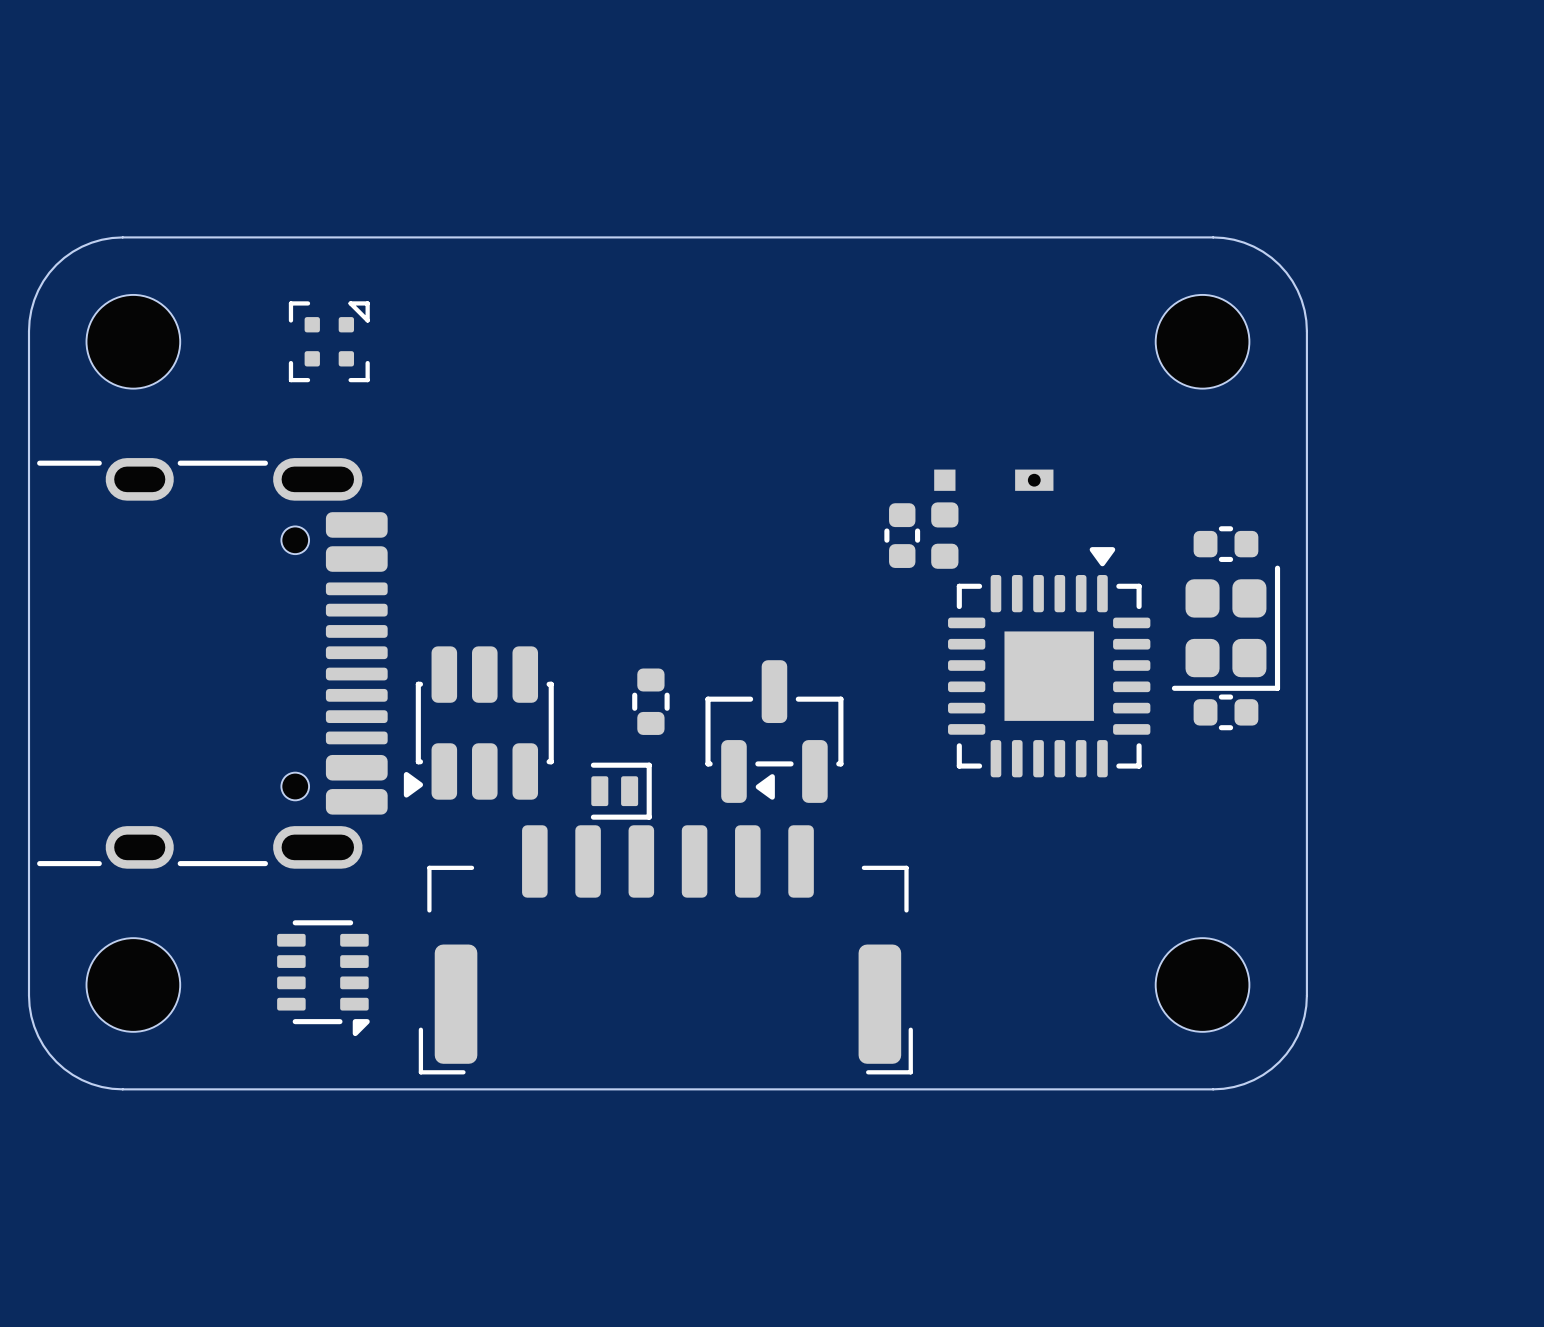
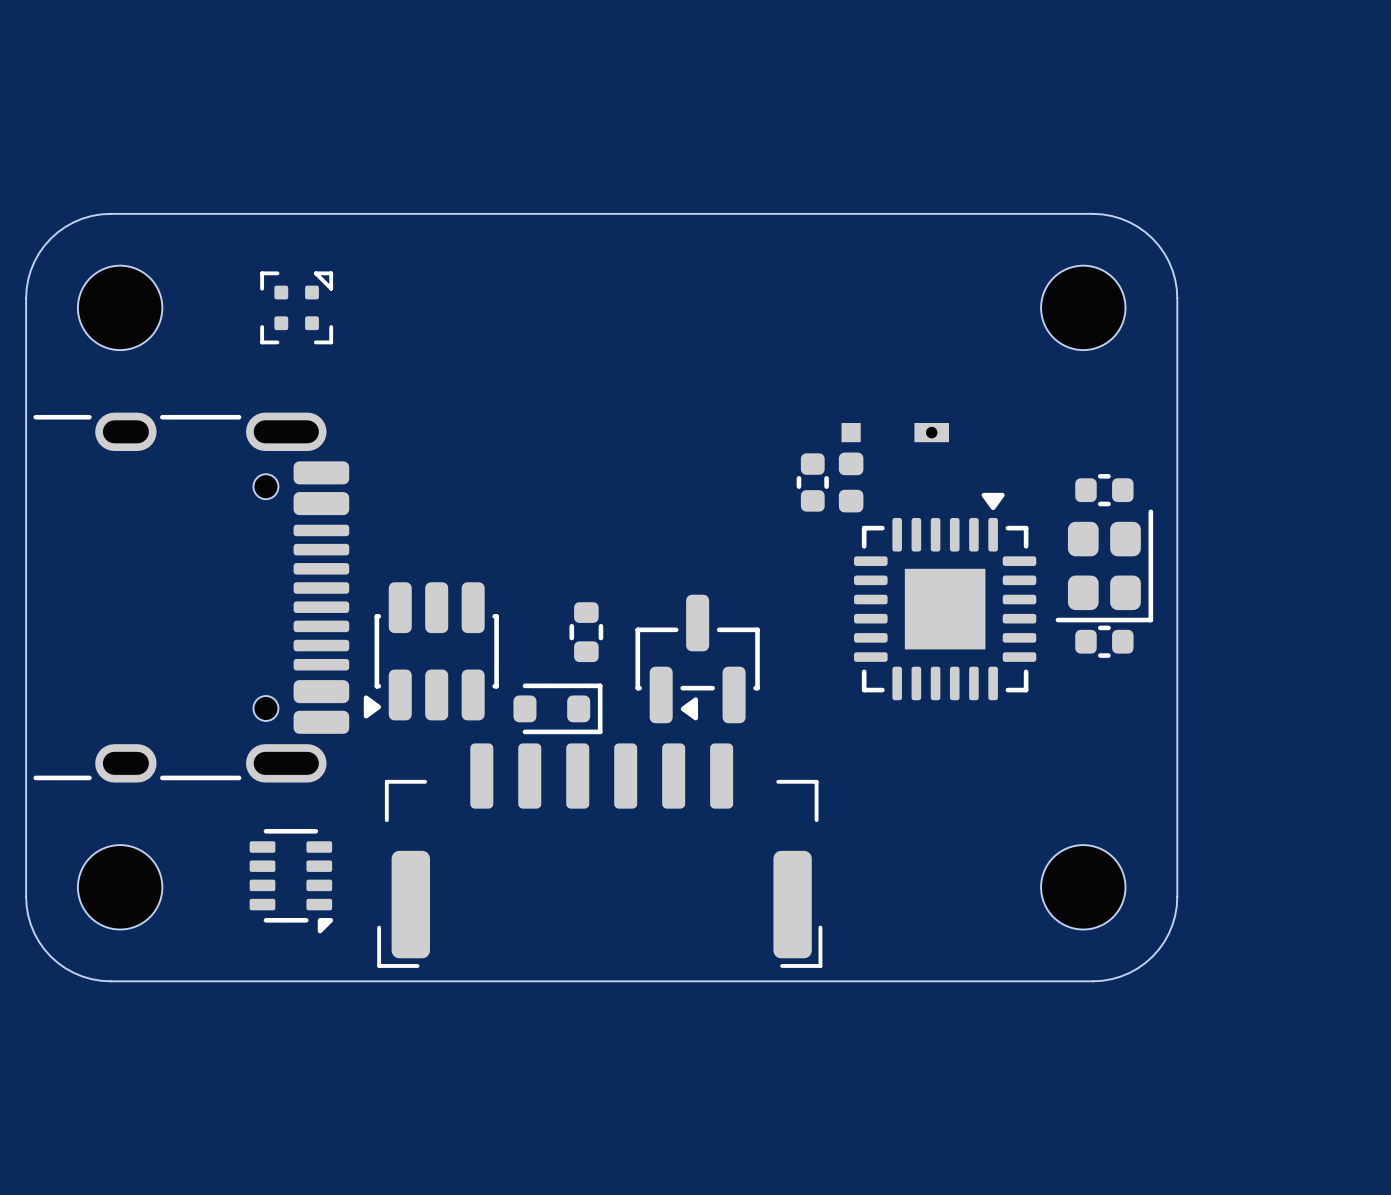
part footprint: [590, 762, 652, 820] -> [513, 683, 603, 735]

